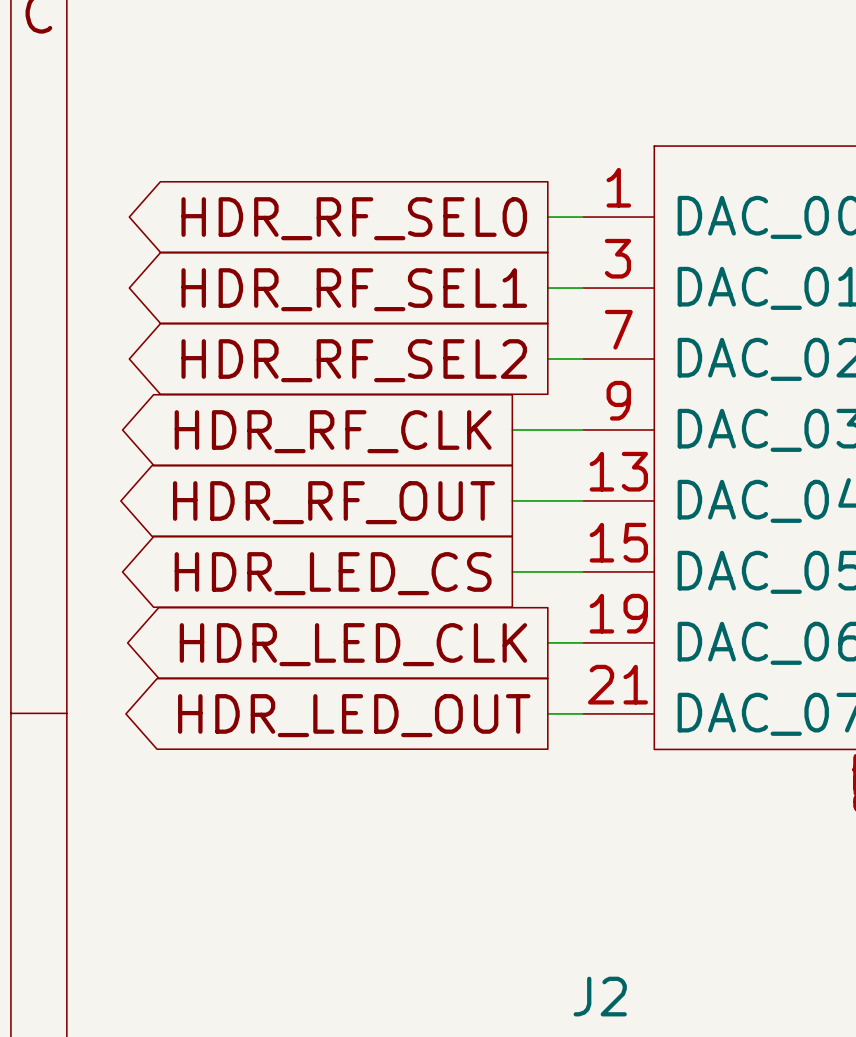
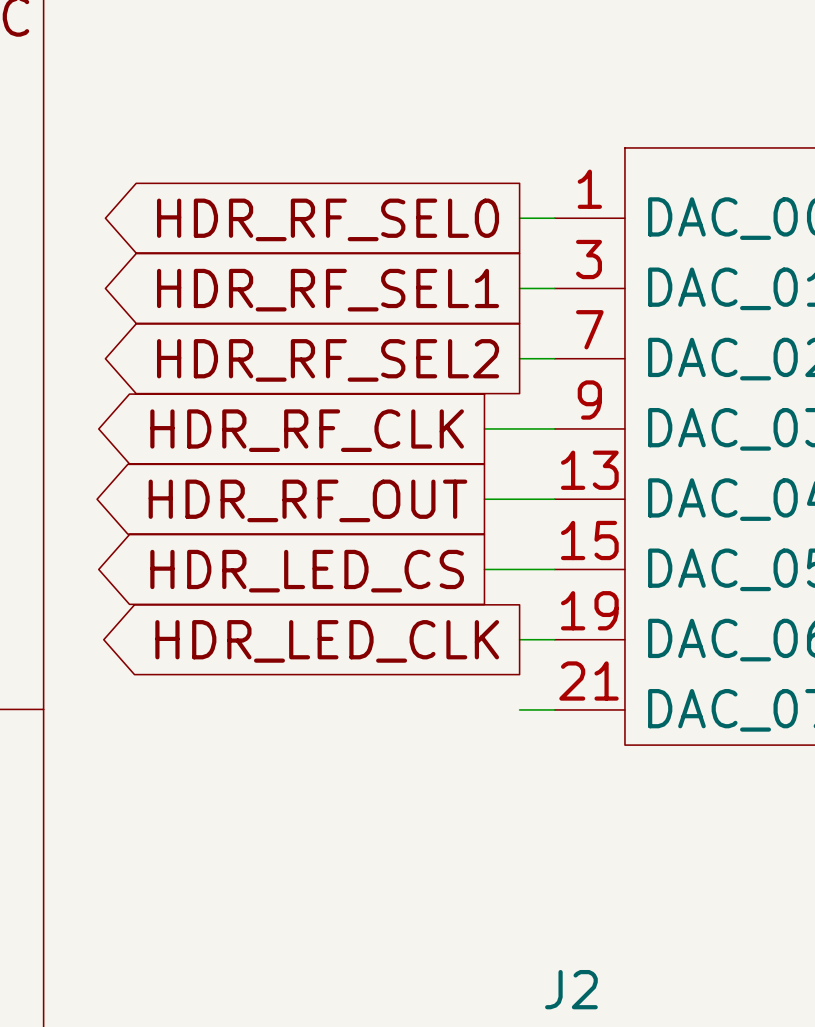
global label: HDR_LED_OUT (354, 715) -> none

